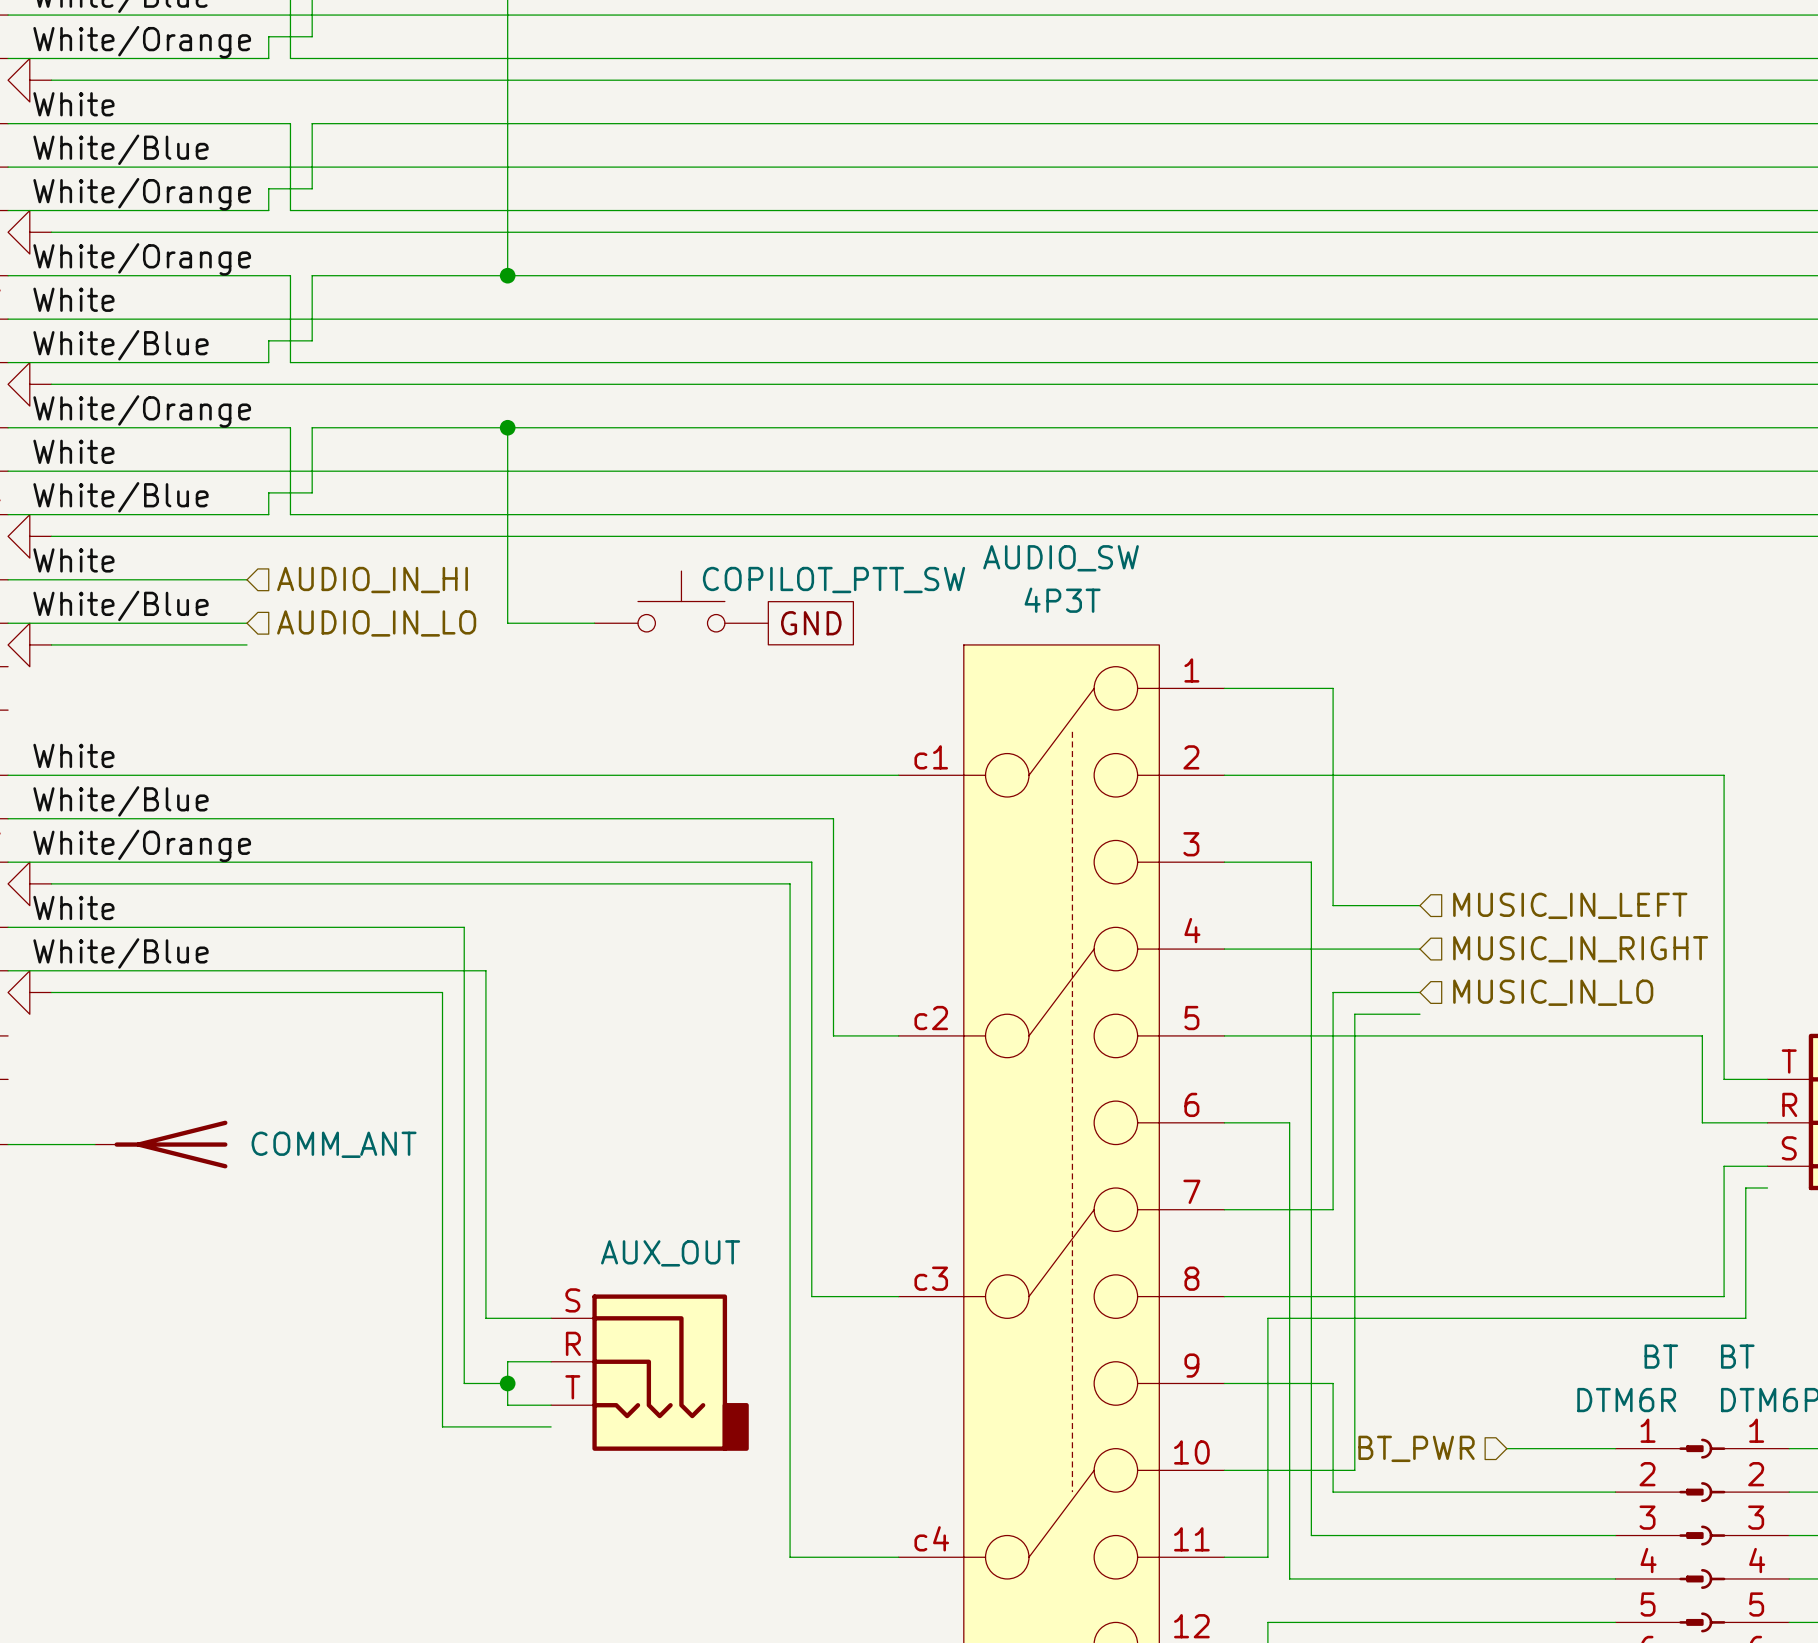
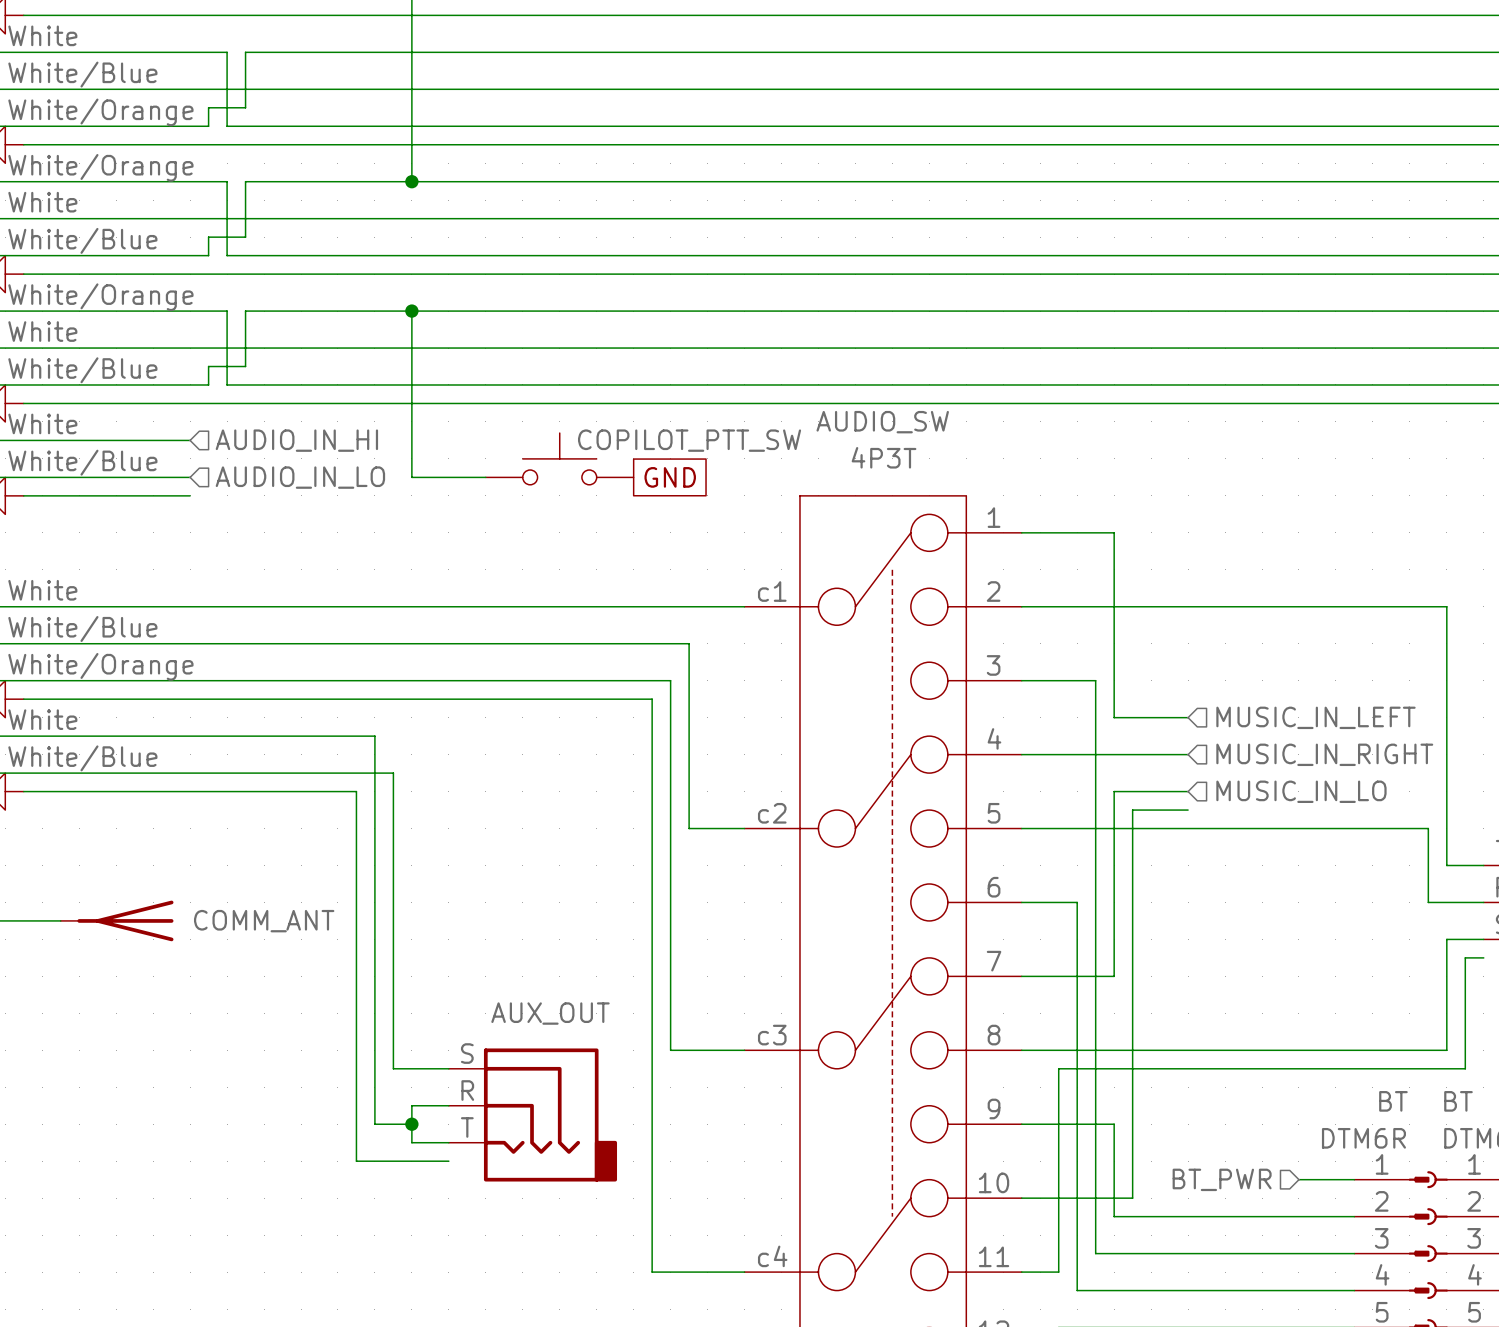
hierarchical label position: BT_PWR (1416, 1448) -> BT_PWR (1222, 1179)
wire: (1506, 1448) (1550, 1448) -> none

